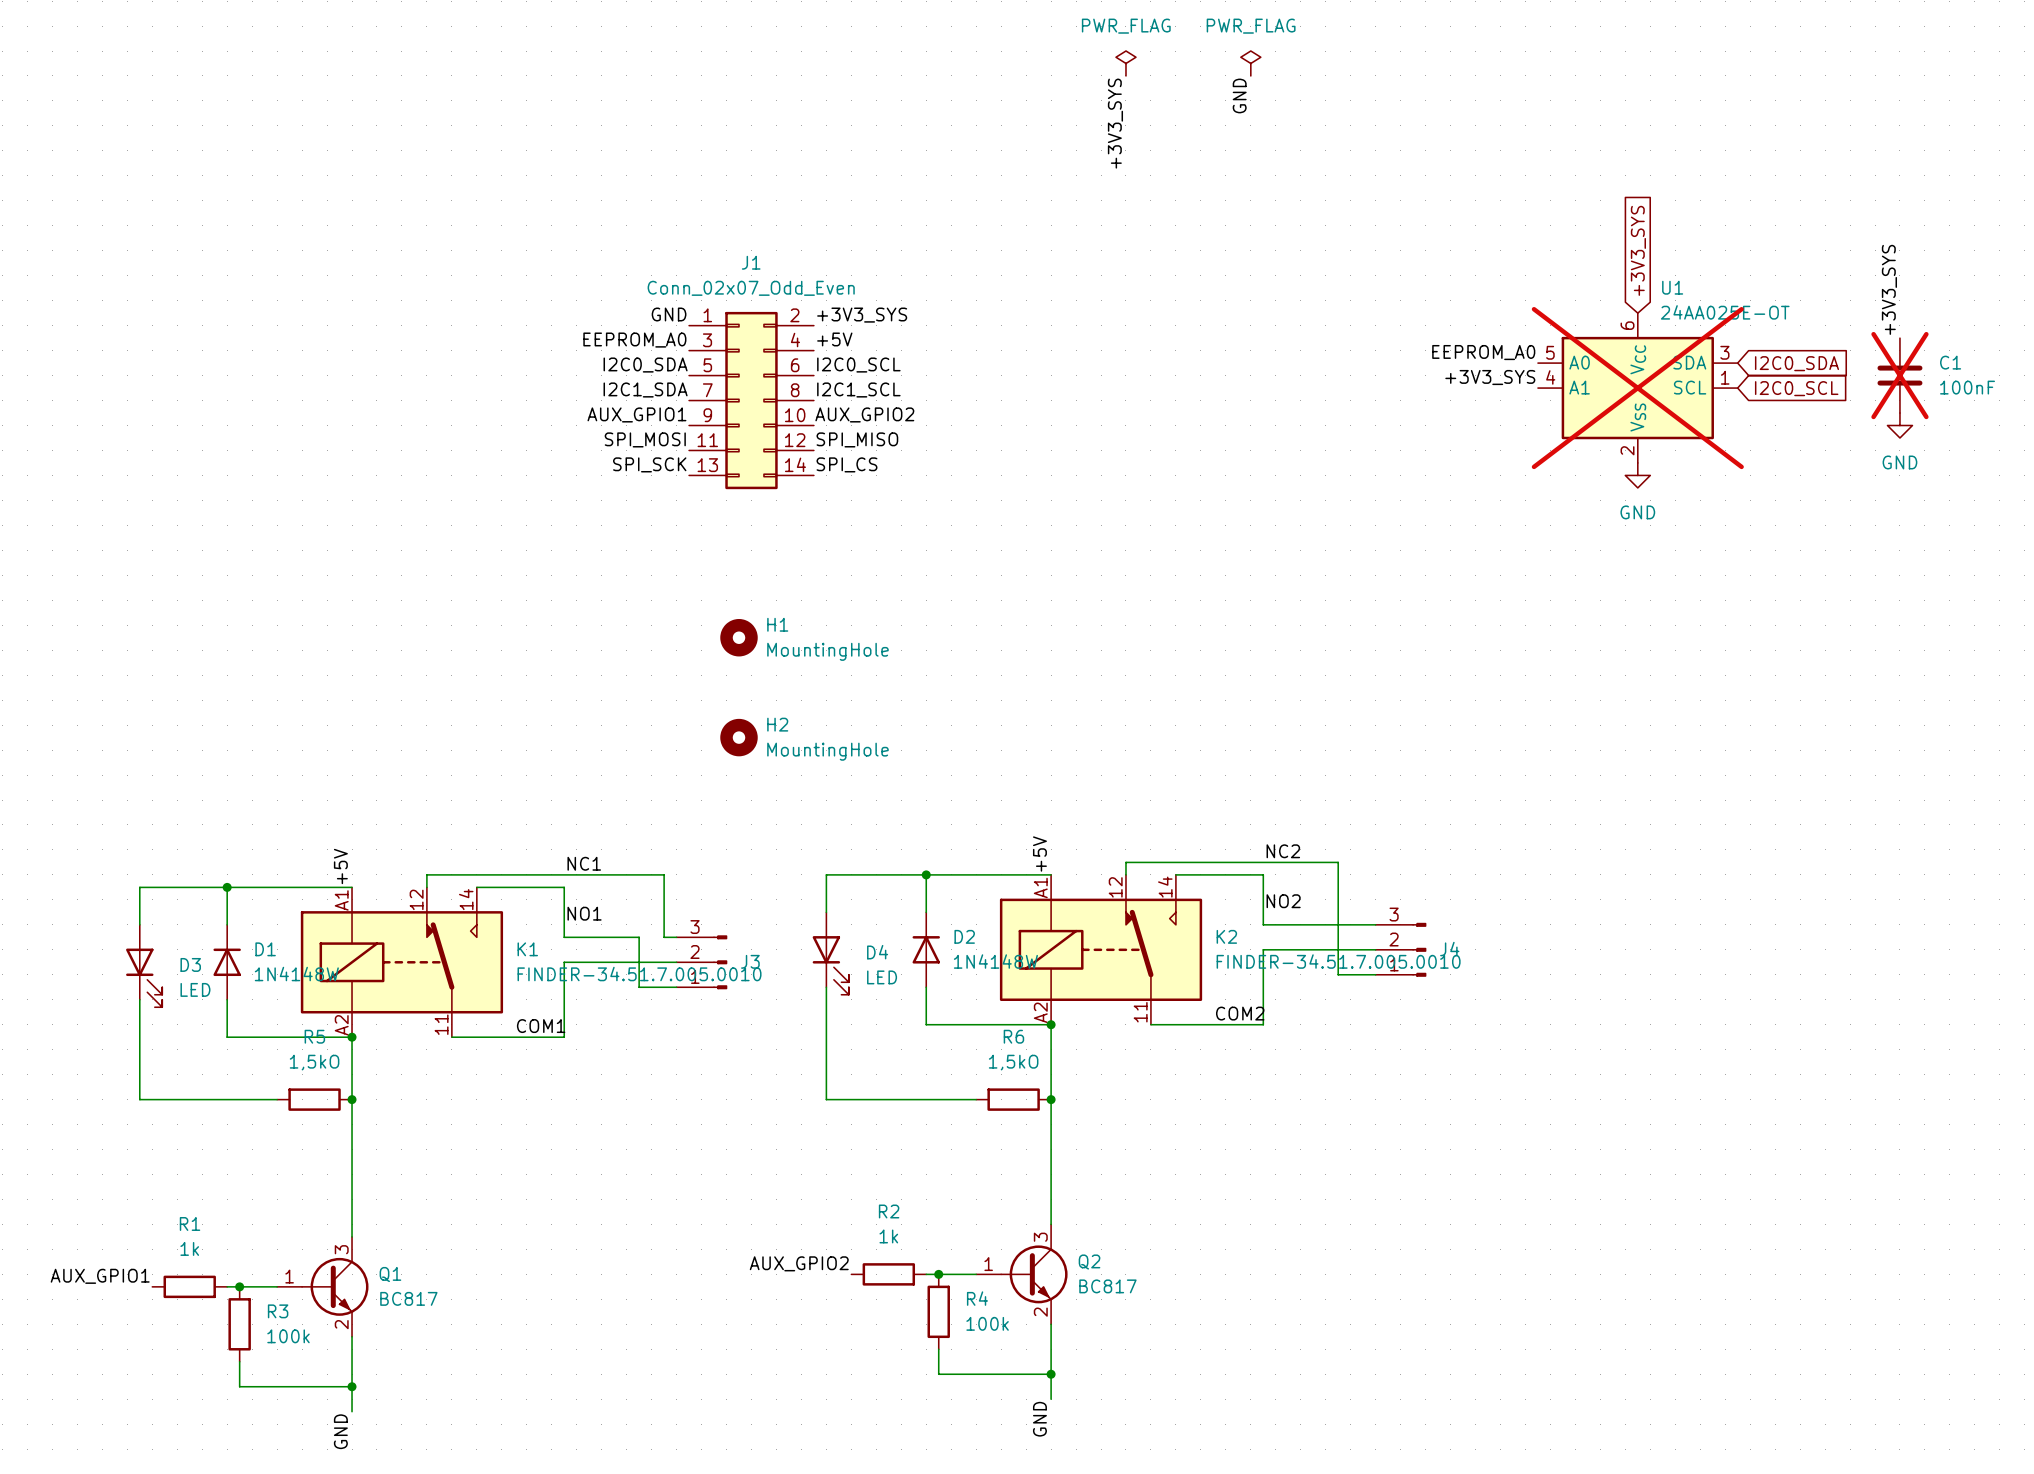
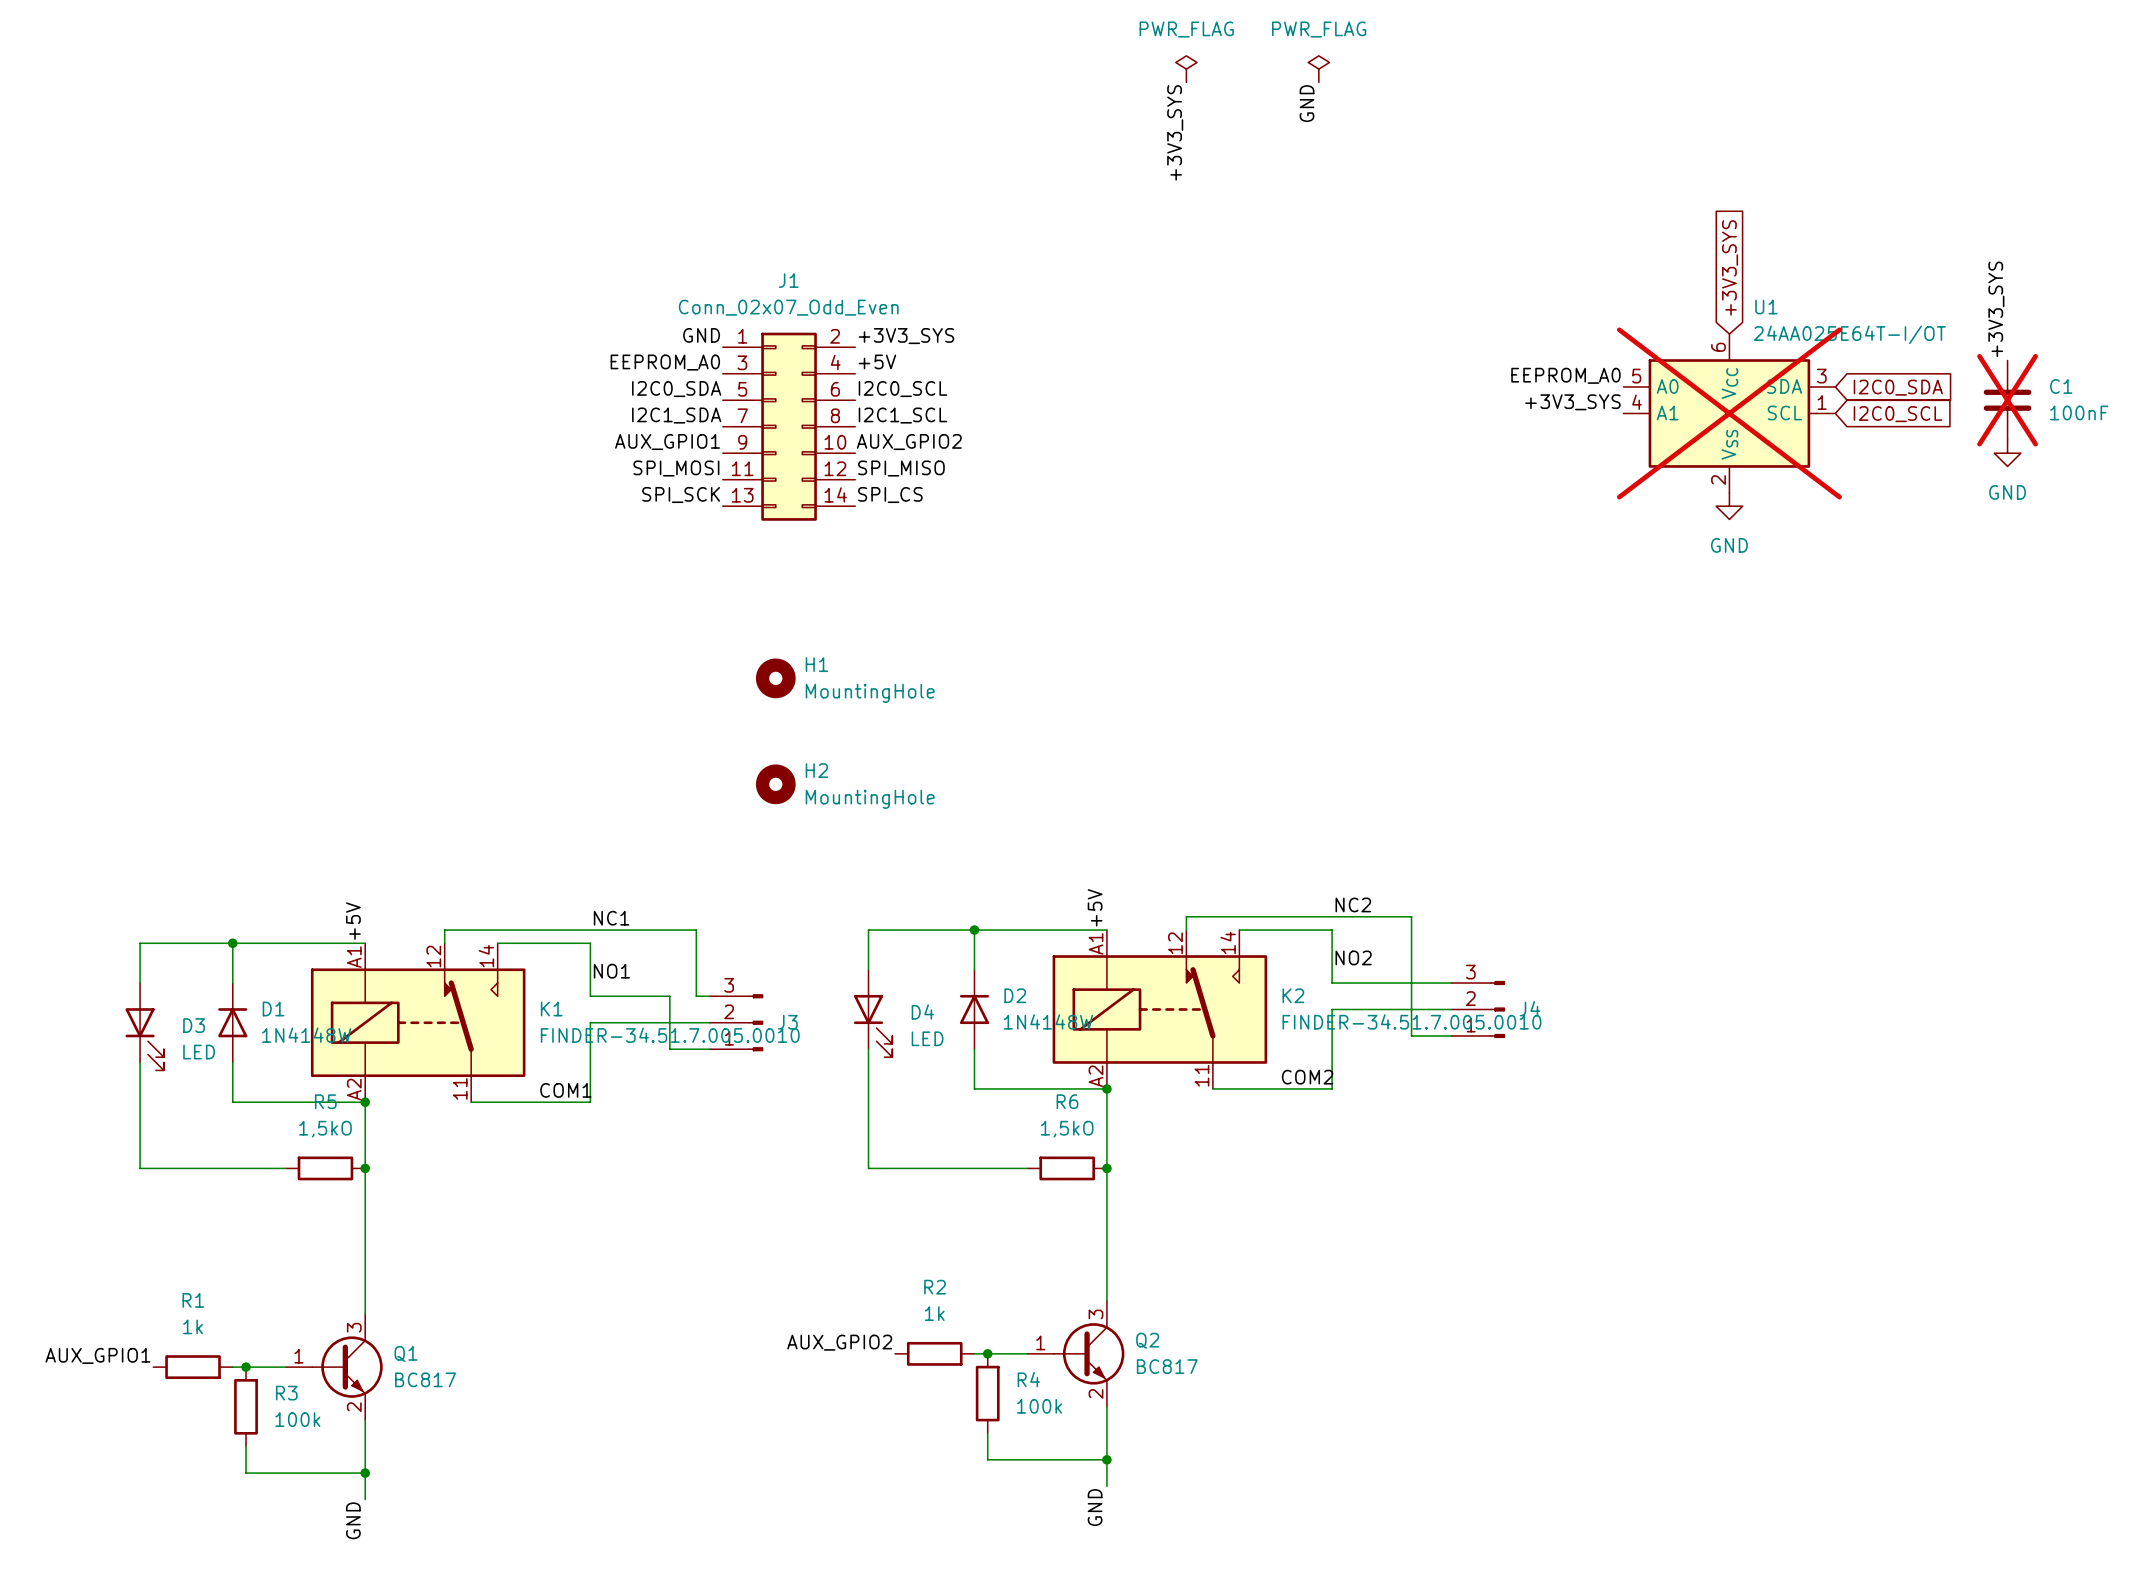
U1 value: 24AA025E-OT (1725, 312) -> 24AA025E64T-I/OT (1849, 334)

